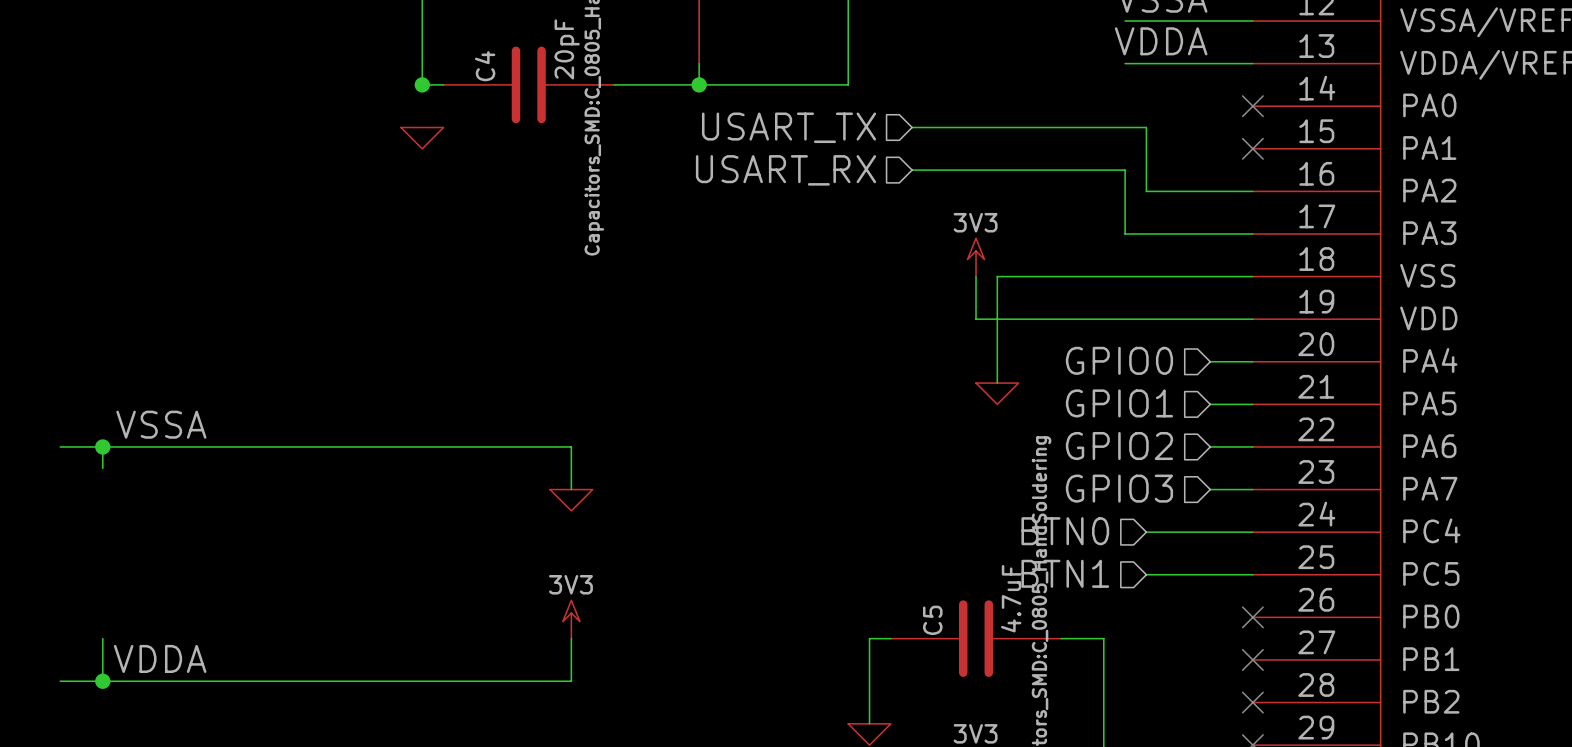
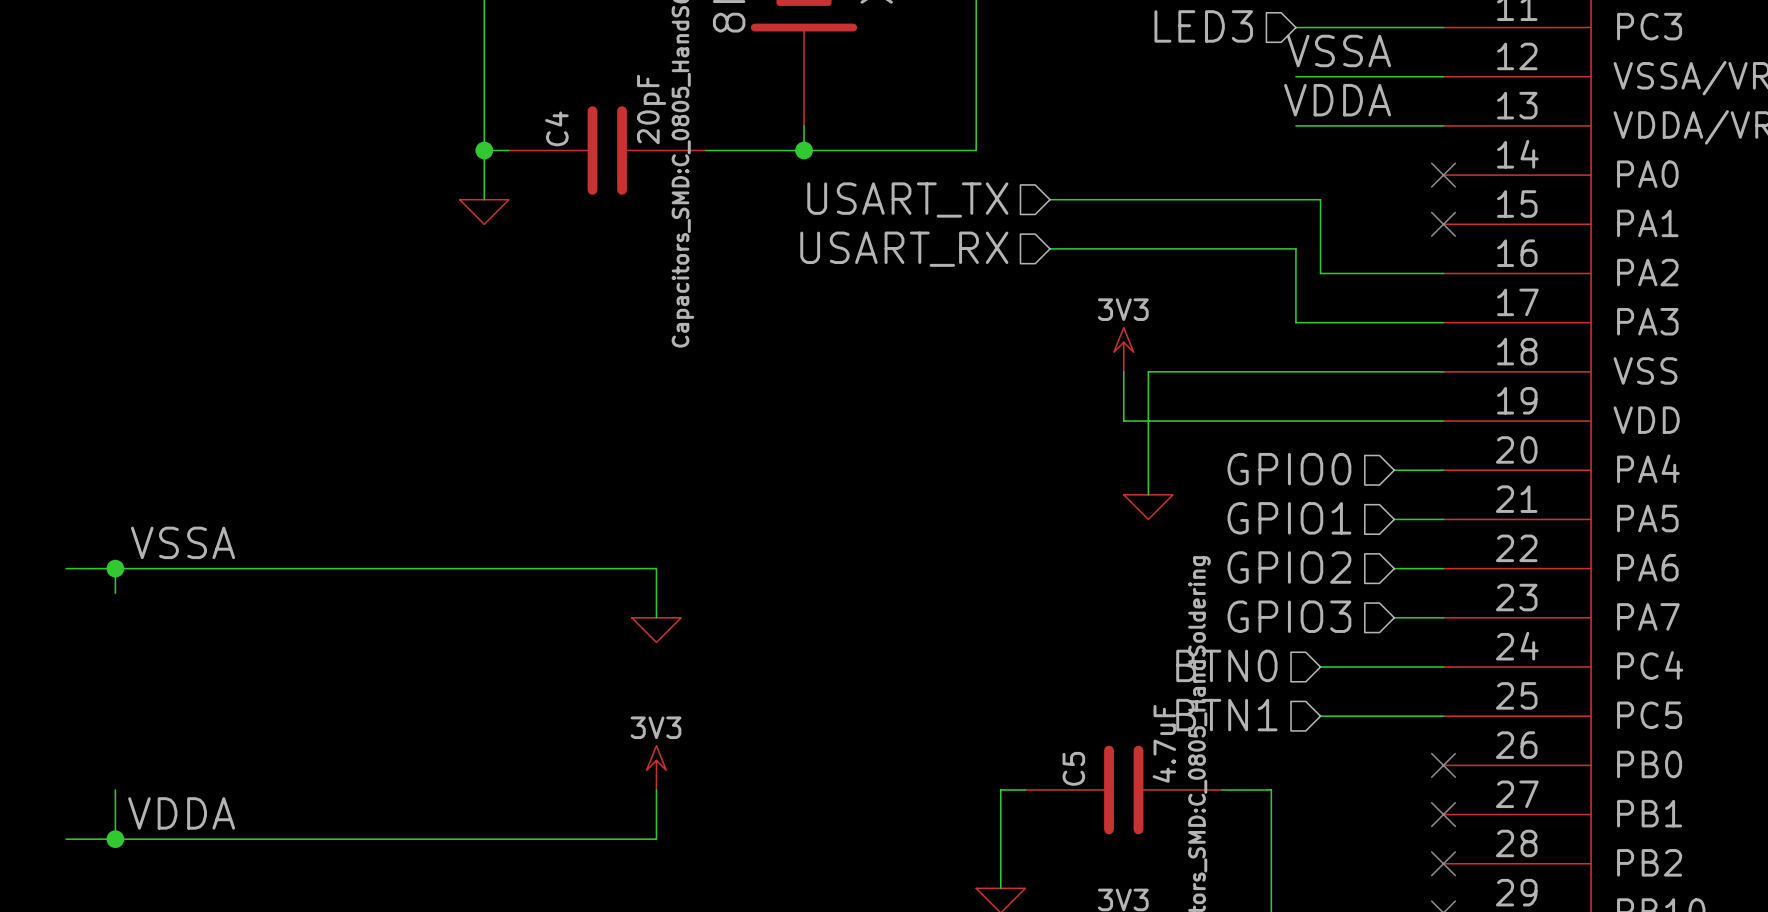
wire: none -> (484, 150) (484, 199)

